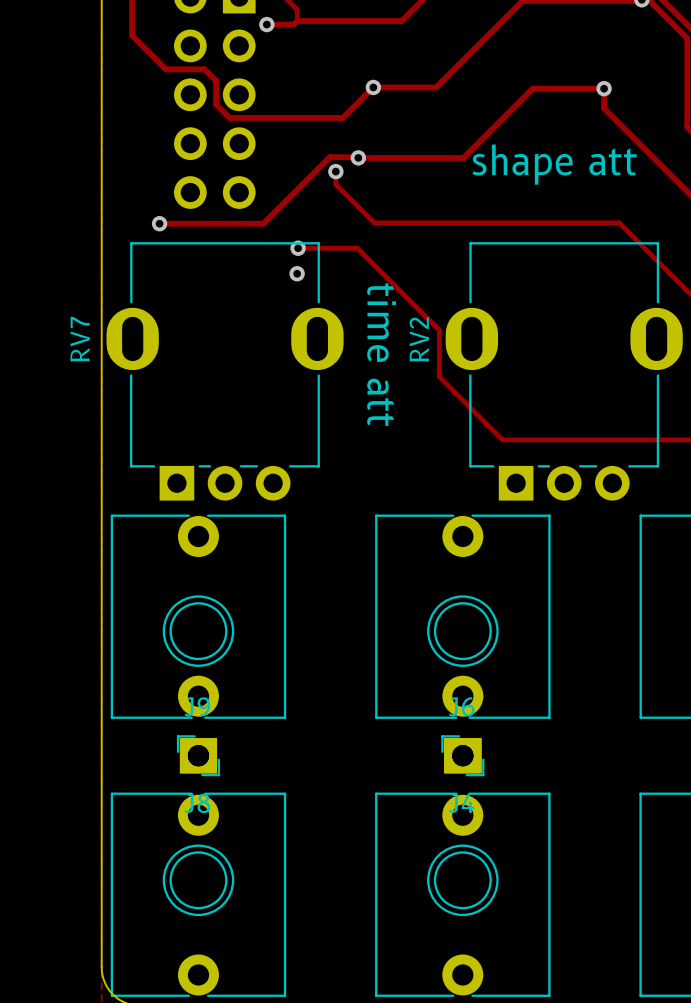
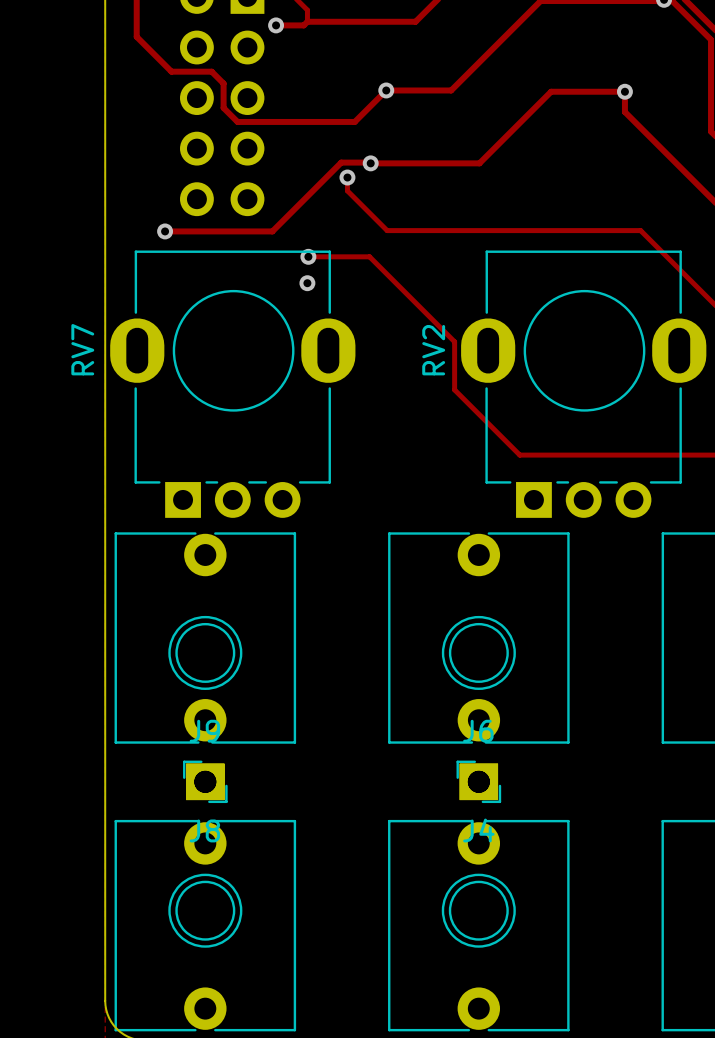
text: shape att (554, 164) -> none
RV7 footprint: [106, 242, 344, 501] -> [110, 250, 356, 518]
RV2 footprint: [445, 242, 683, 501] -> [461, 250, 707, 518]
text: time att (381, 354) -> none

